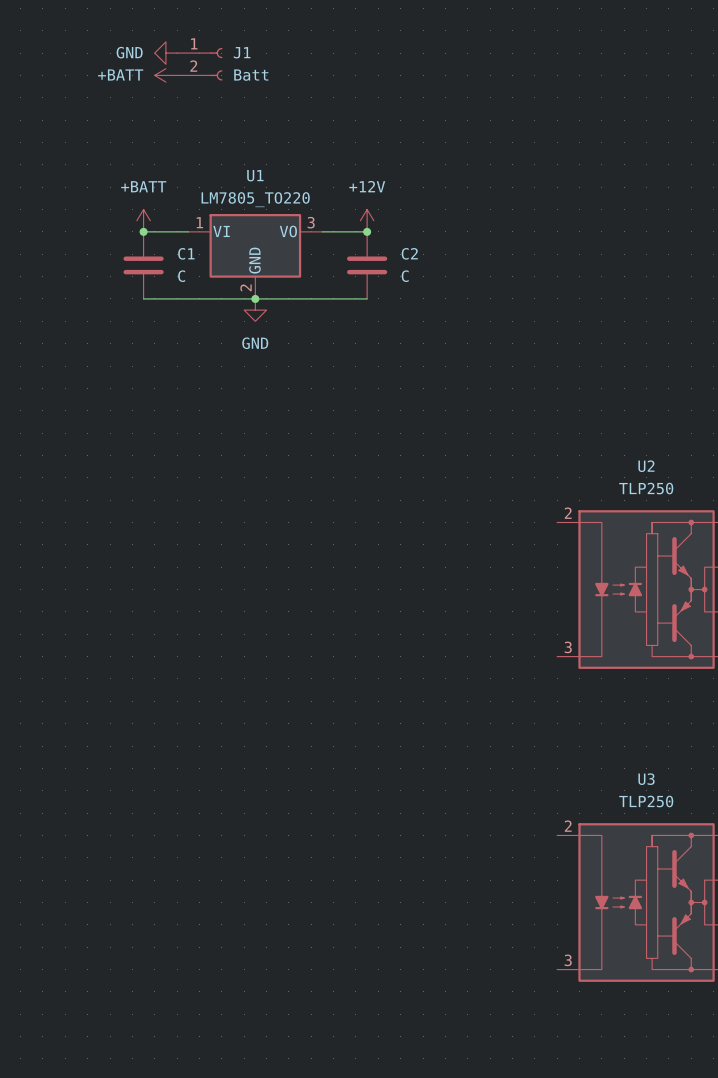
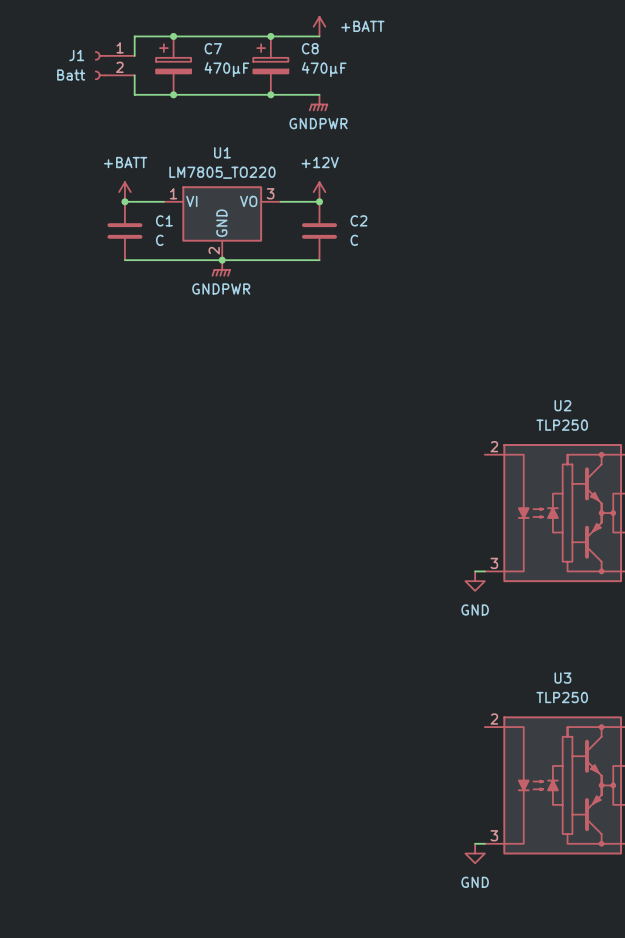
junction: none -> (173, 36)
junction: none -> (270, 36)
wire: none -> (319, 36) (134, 36) (134, 55)
power symbol: GND (165, 53) -> none
J1 position: (199, 64) -> (114, 65)
J1 flip: as is (216, 64) -> left-right (100, 65)
power symbol text position: +BATT (120, 74) -> +BATT (362, 26)
power symbol rotation: 0° (165, 75) -> 90° clockwise (319, 26)
power symbol position: +BATT (165, 75) -> +BATT (319, 26)
C7: none -> 470μF (173, 65)
C8: none -> 470μF (270, 65)
wire: none -> (134, 75) (134, 94) (319, 94)
junction: none -> (173, 94)
junction: none -> (270, 94)
power symbol: none -> GNDPWR (318, 102)
power symbol: GND (255, 310) -> GNDPWR (221, 268)
wire: none -> (475, 571) (484, 571)
power symbol: none -> GND (475, 581)
wire: none -> (475, 843) (484, 843)
power symbol: none -> GND (475, 853)

